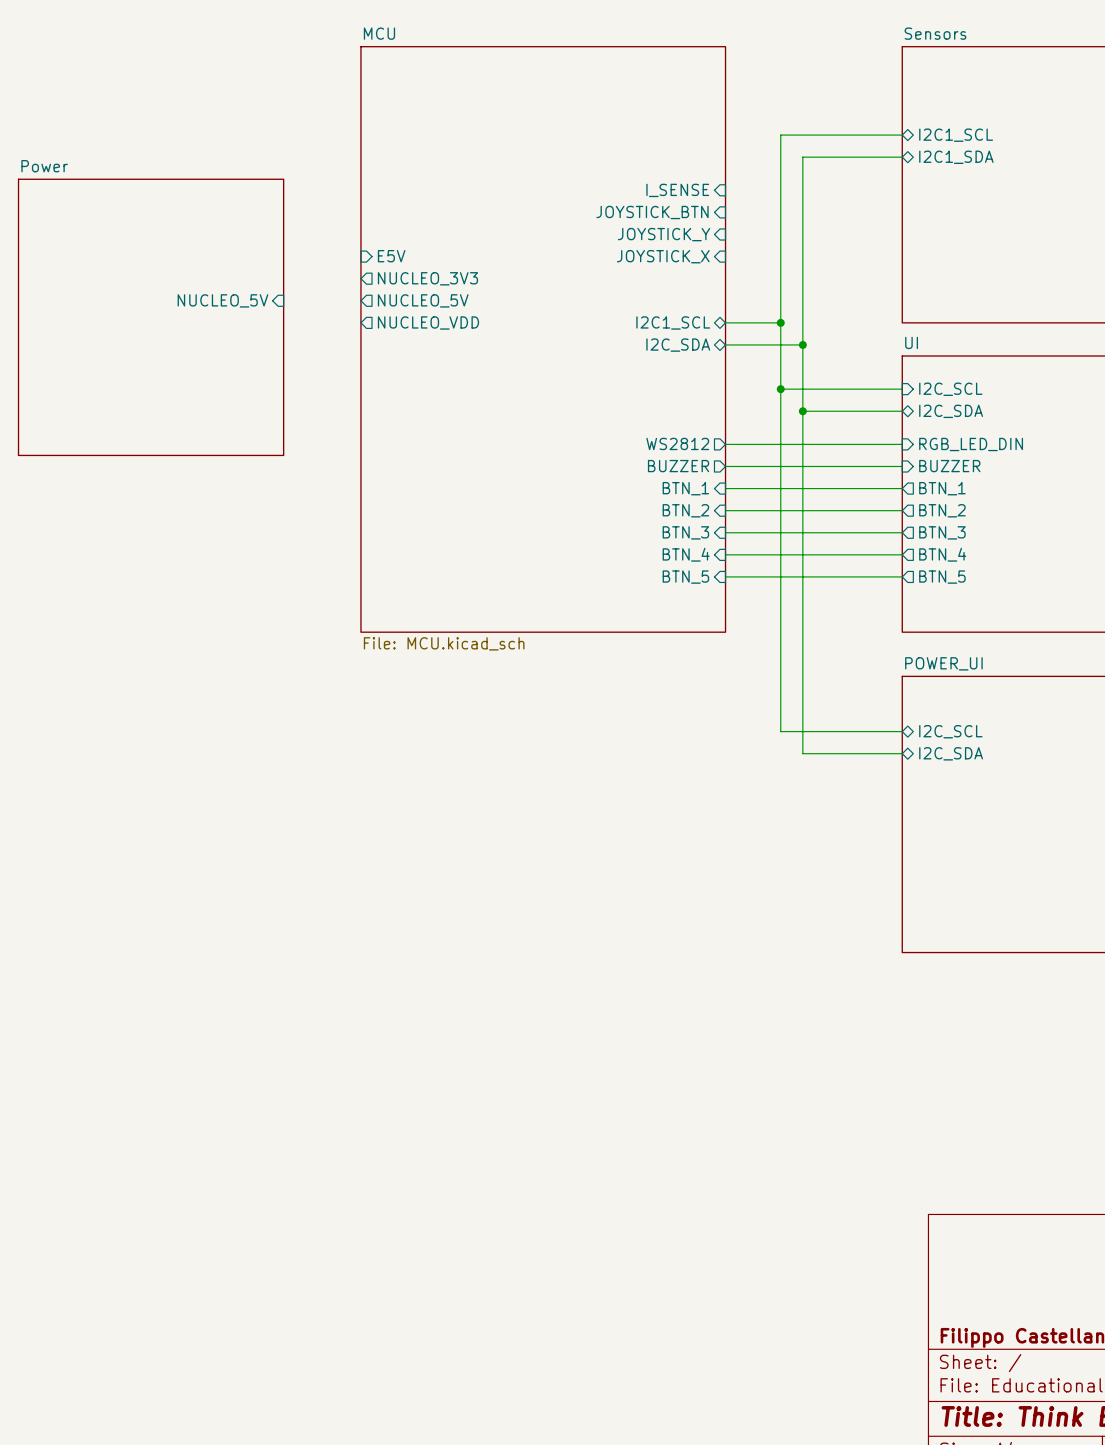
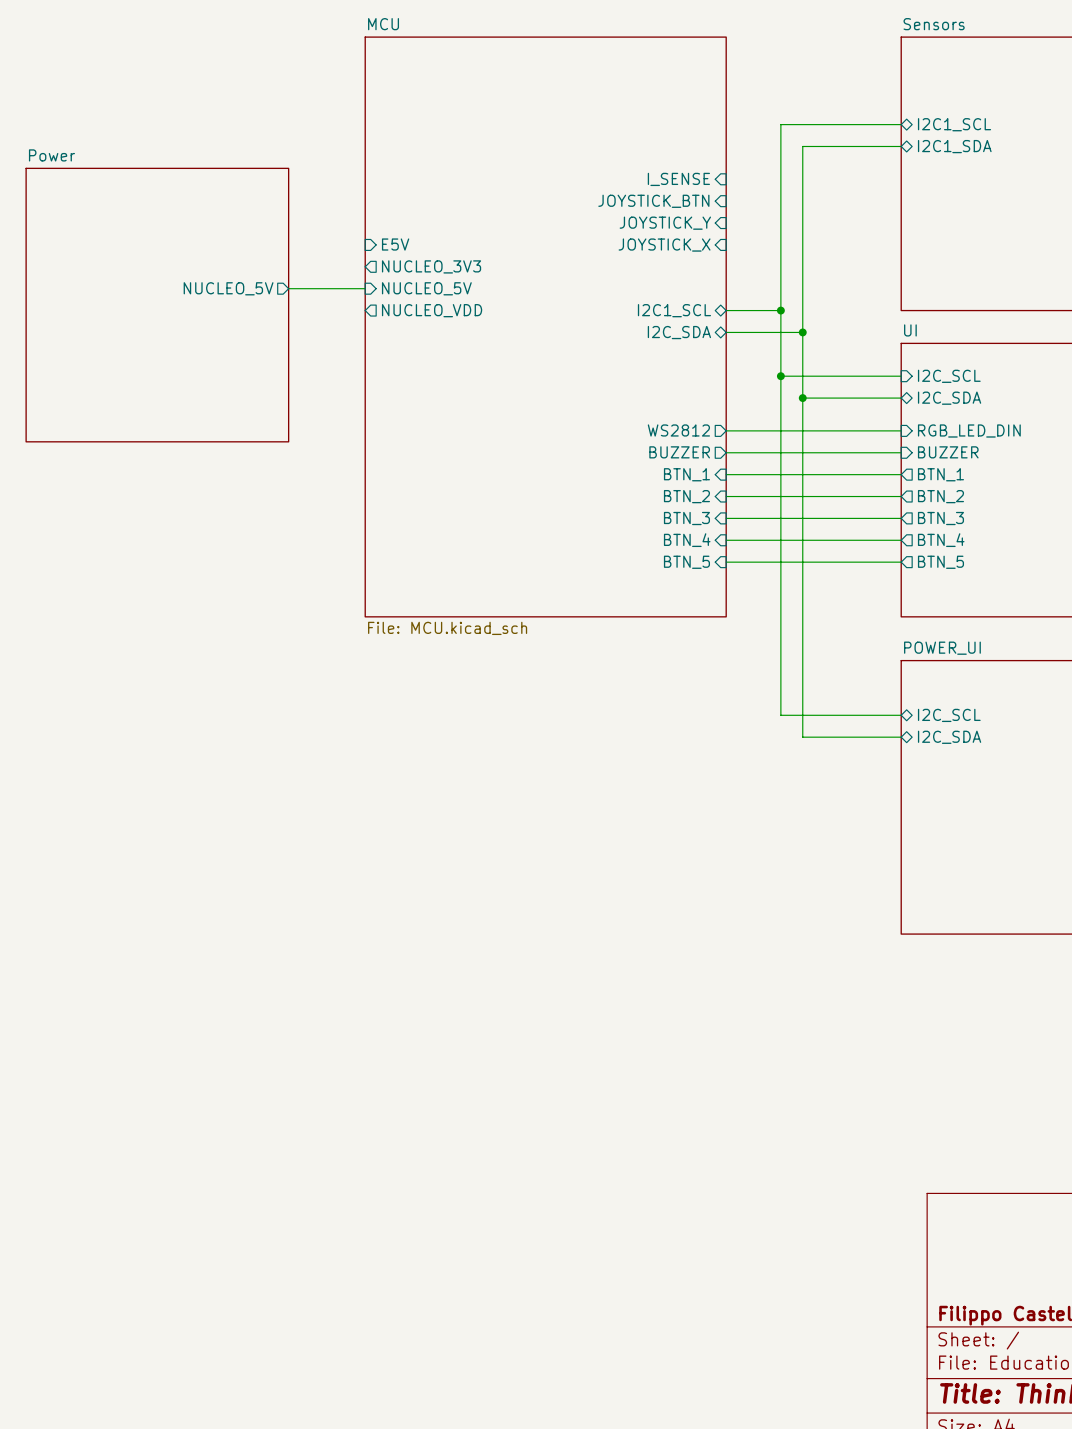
sheet pin shape: input (222, 300) -> output (228, 288)
wire: none -> (288, 288) (365, 288)
sheet pin shape: output (423, 300) -> input (426, 288)

